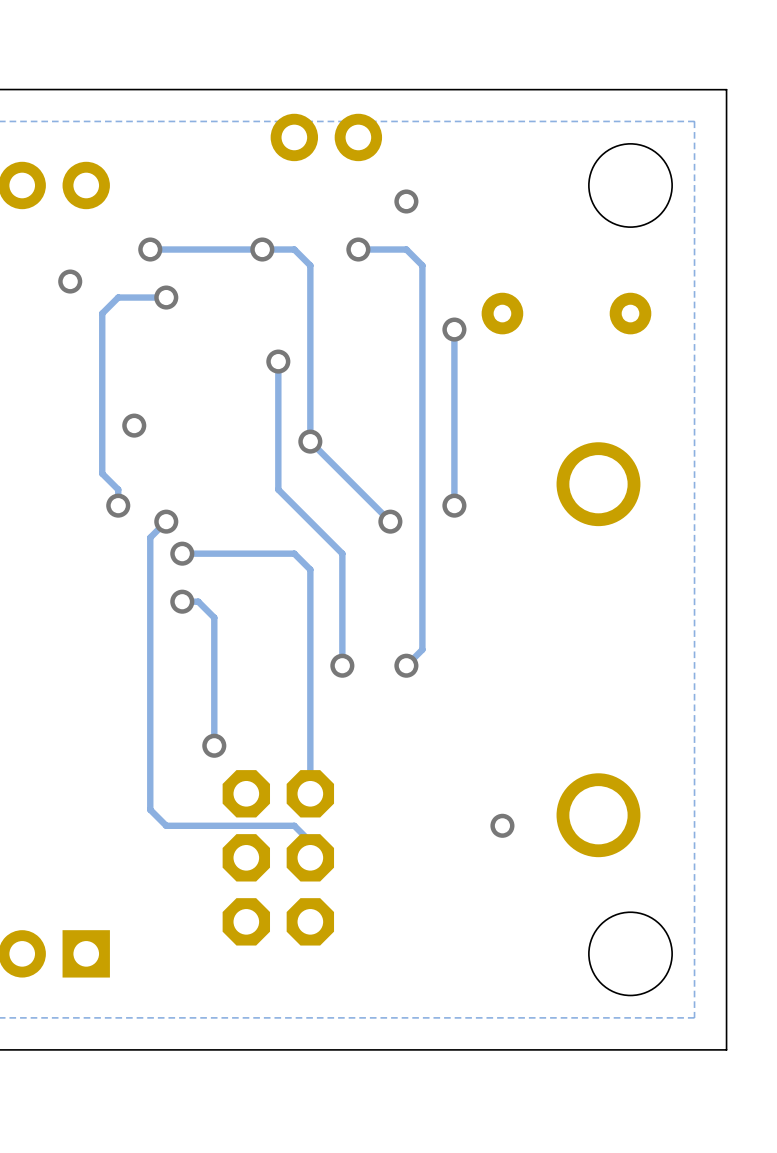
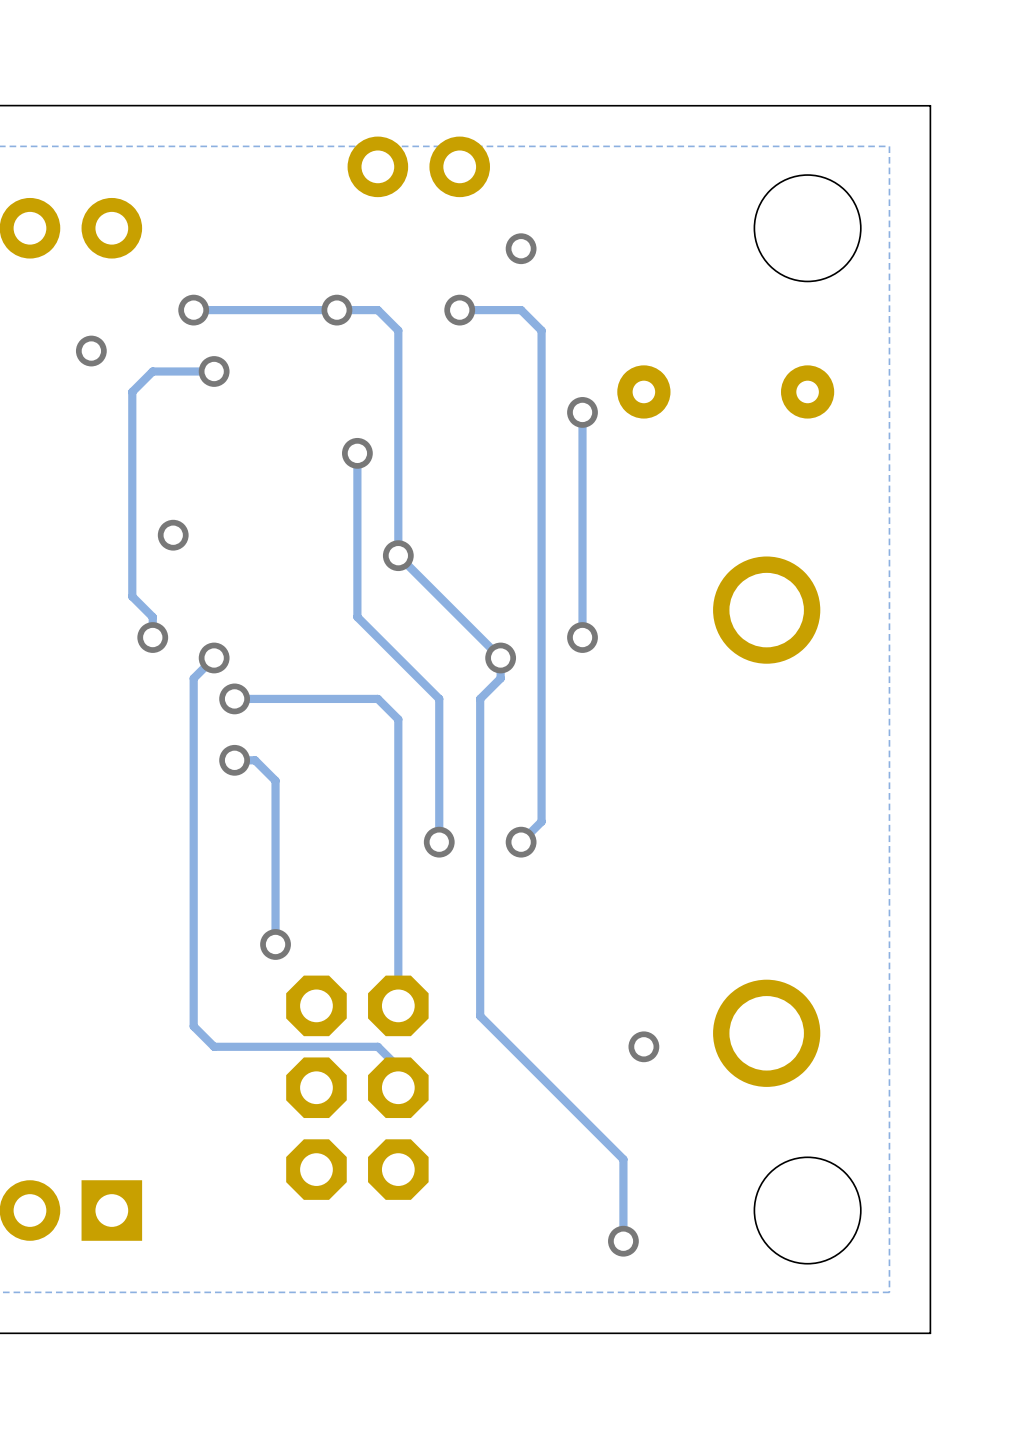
track: none -> (500, 657) (500, 678) (480, 698) (480, 1016) (623, 1159) (623, 1241)
via: none -> (623, 1241)

